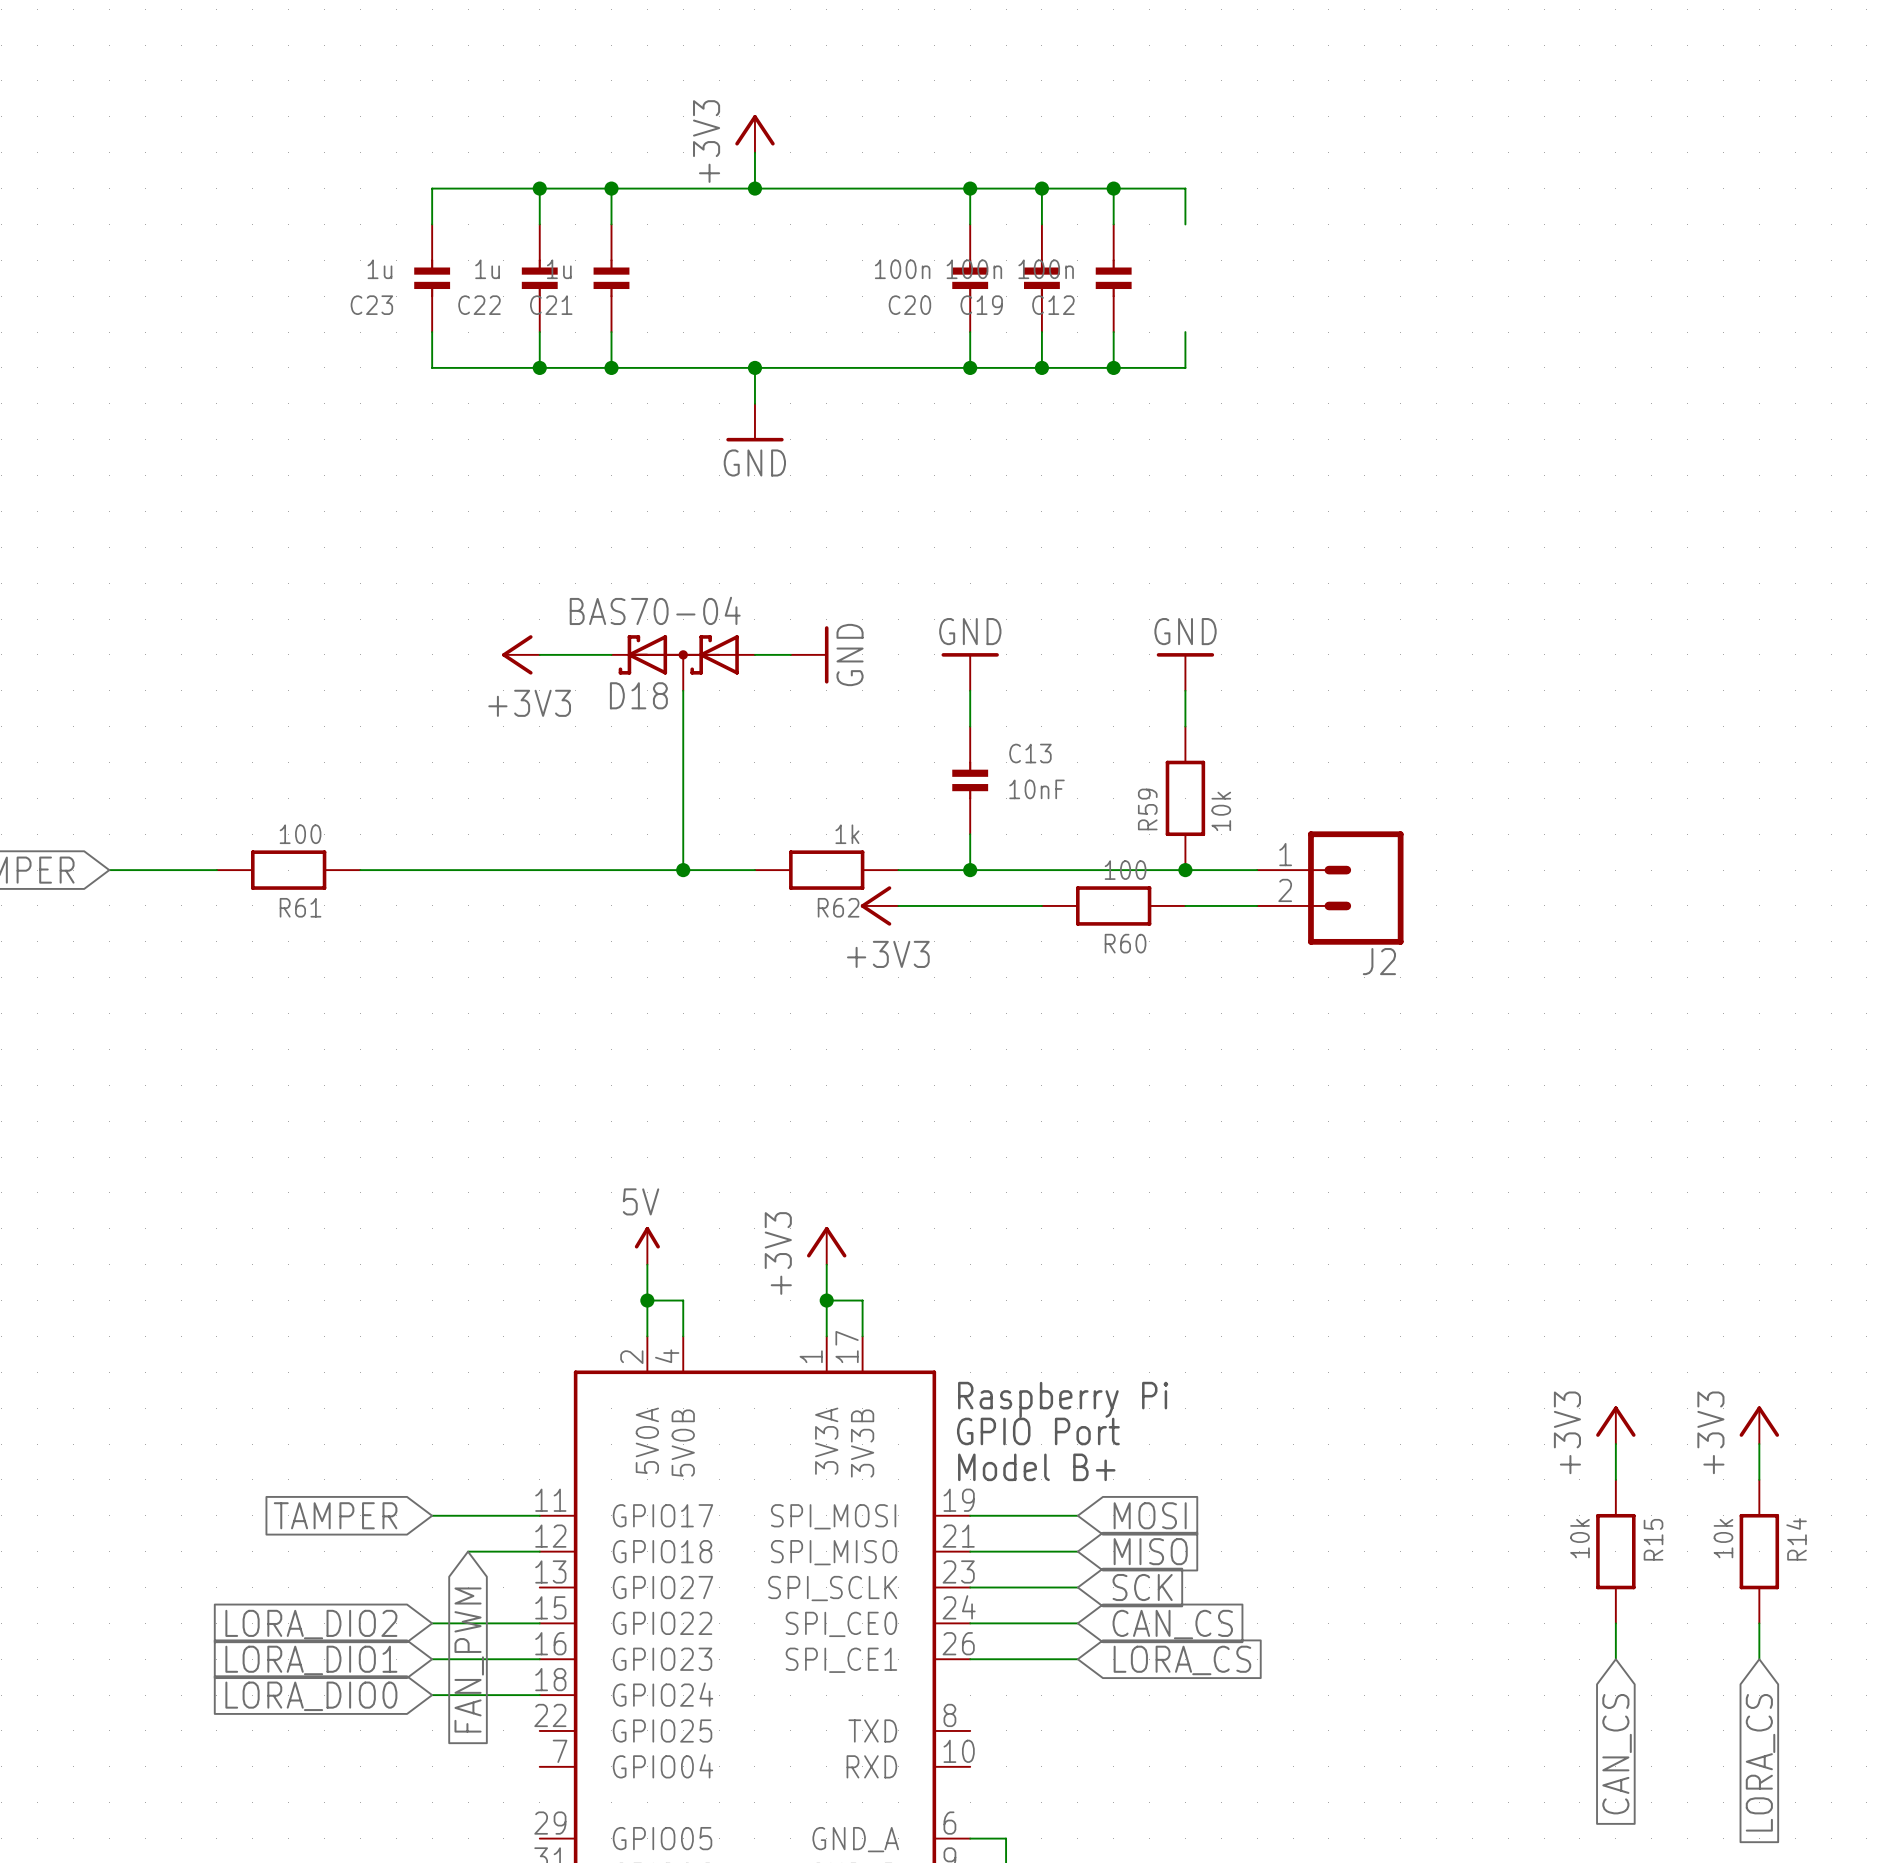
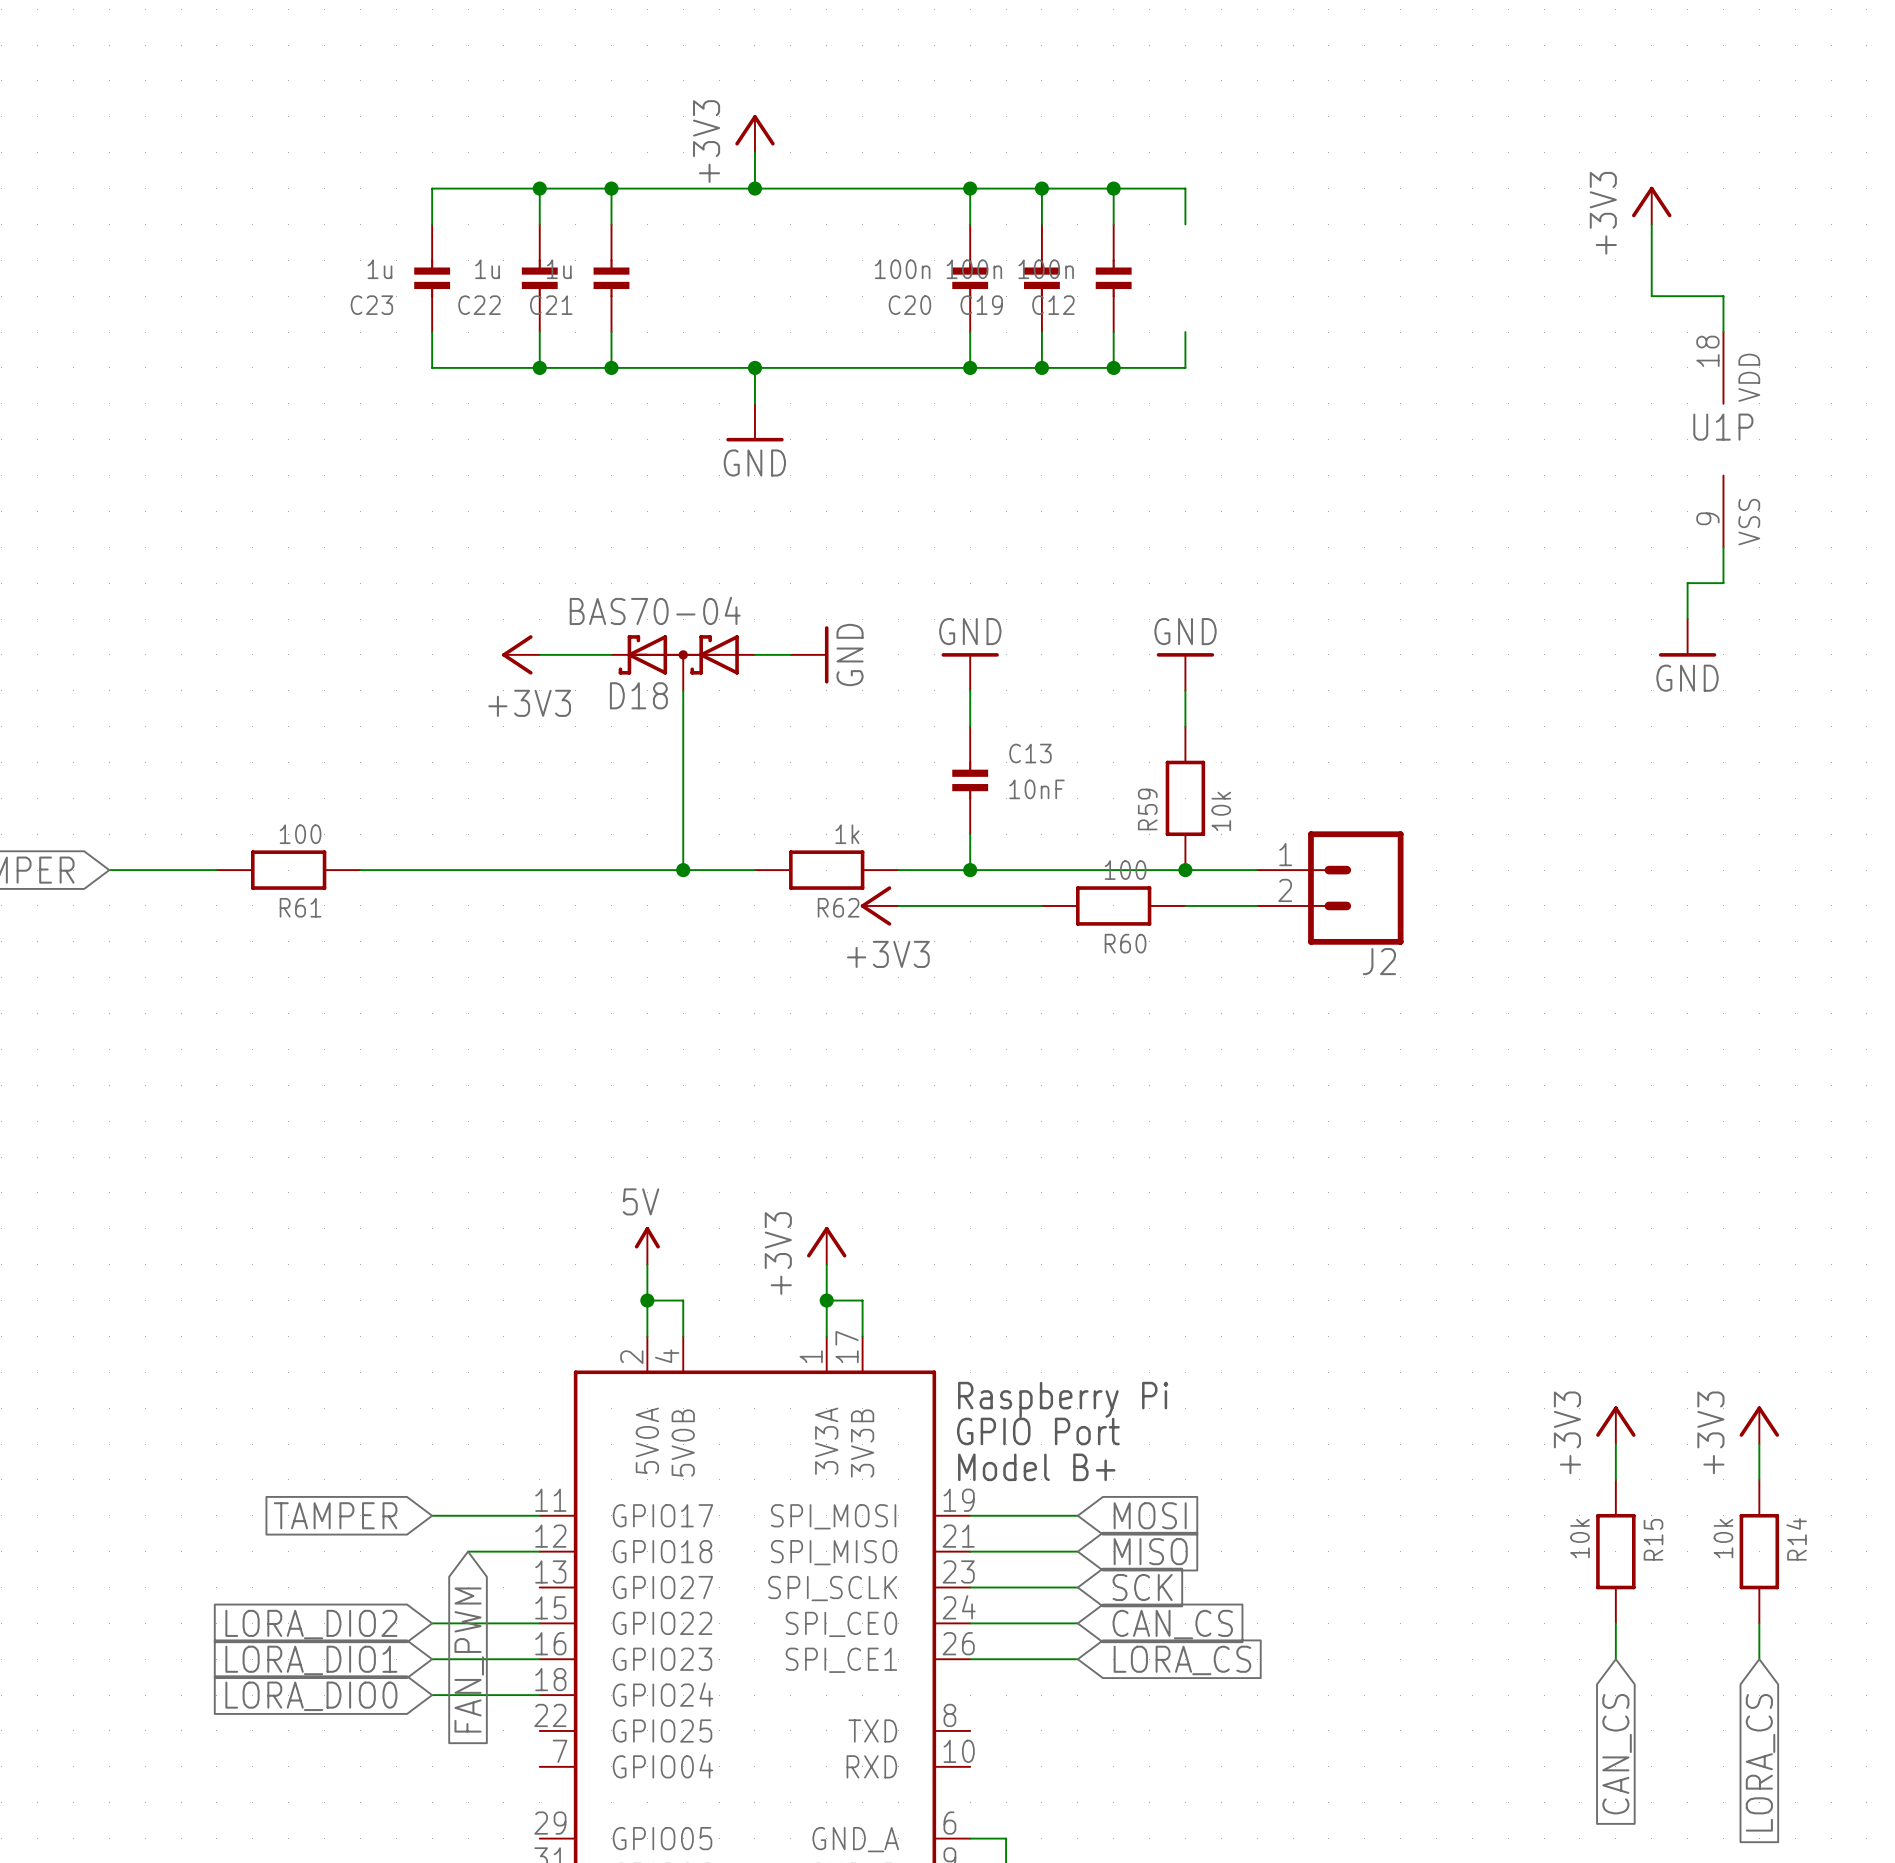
power symbol: none -> +3V3 (1651, 205)
wire: none -> (1651, 224) (1651, 296) (1723, 296) (1723, 332)
U1P: none -> (1723, 439)
wire: none -> (1723, 547) (1723, 583) (1687, 583) (1687, 619)
power symbol: none -> GND (1687, 637)

